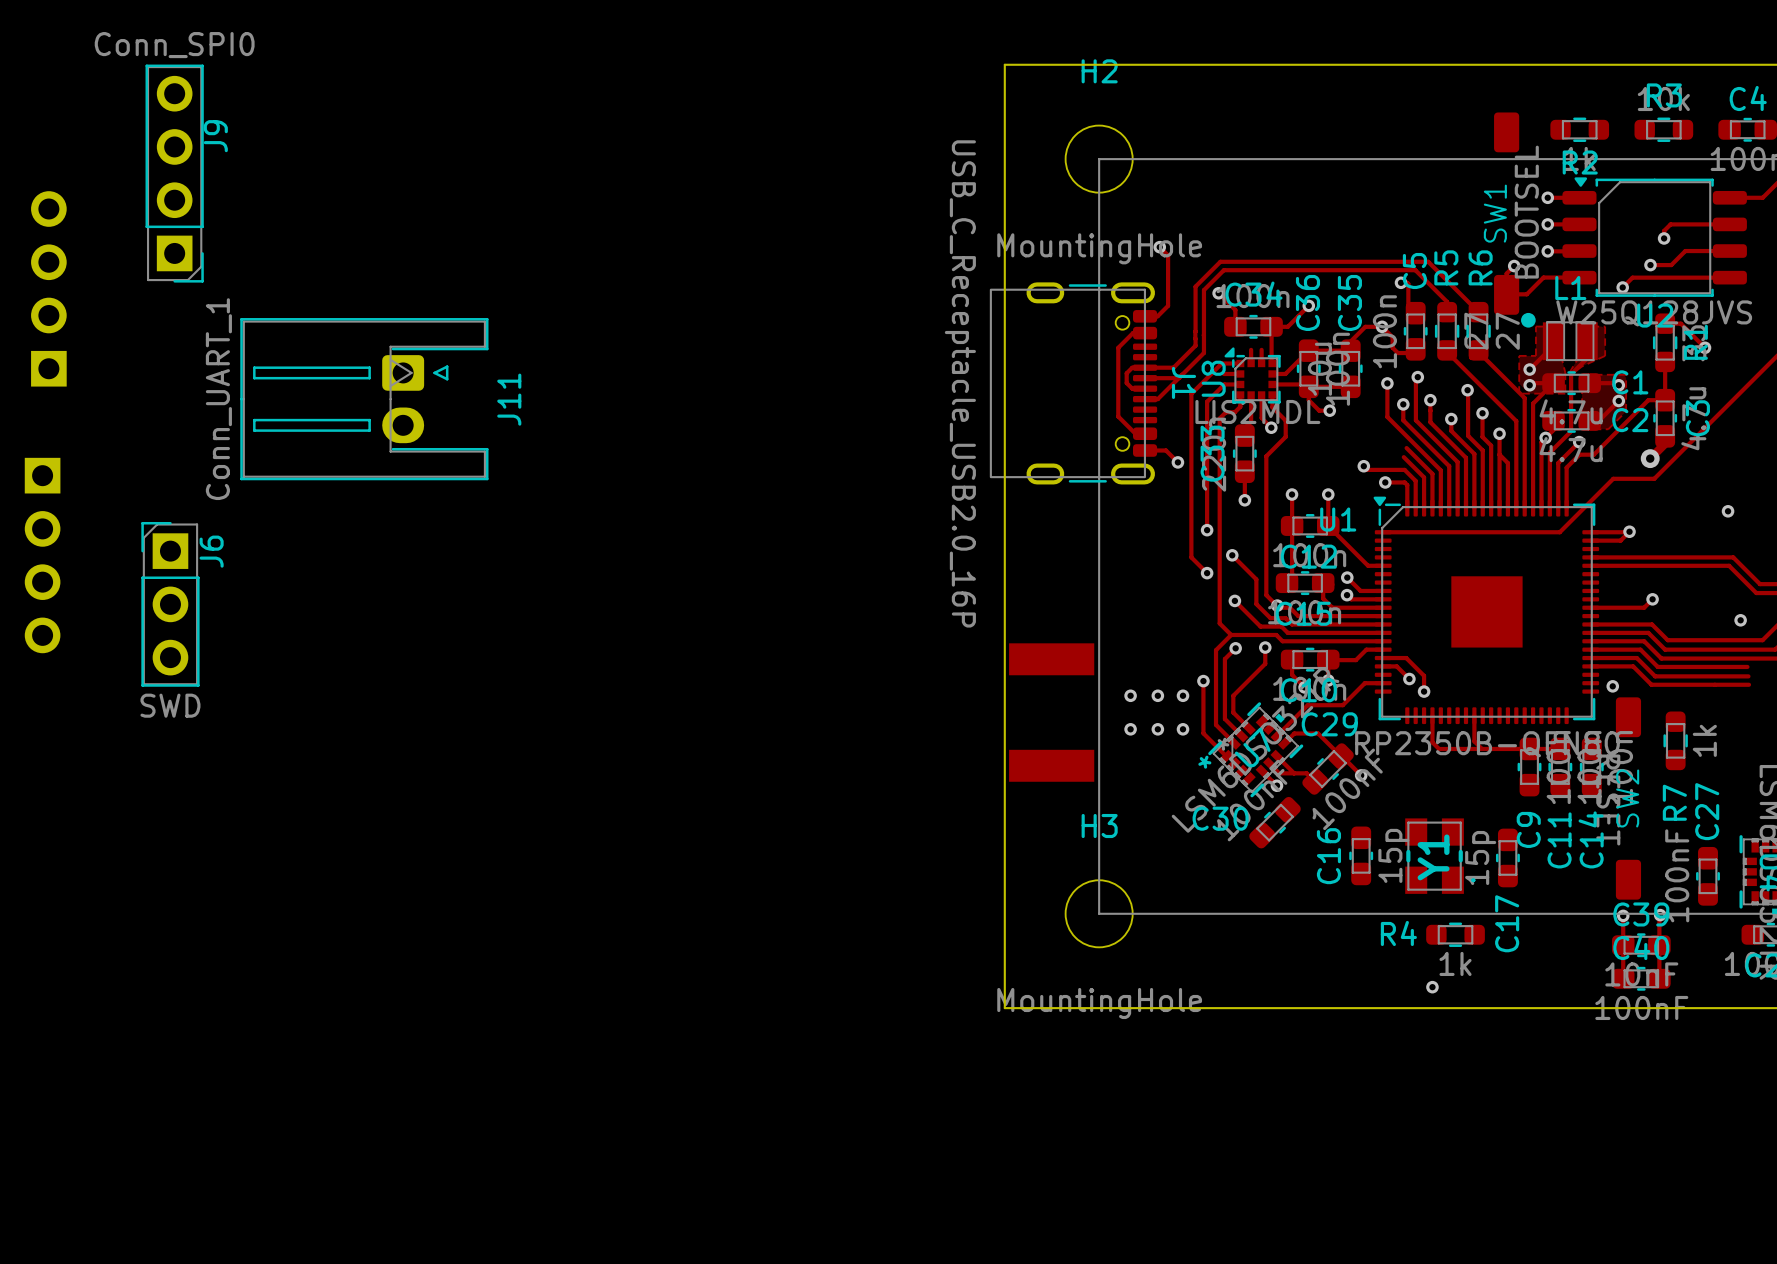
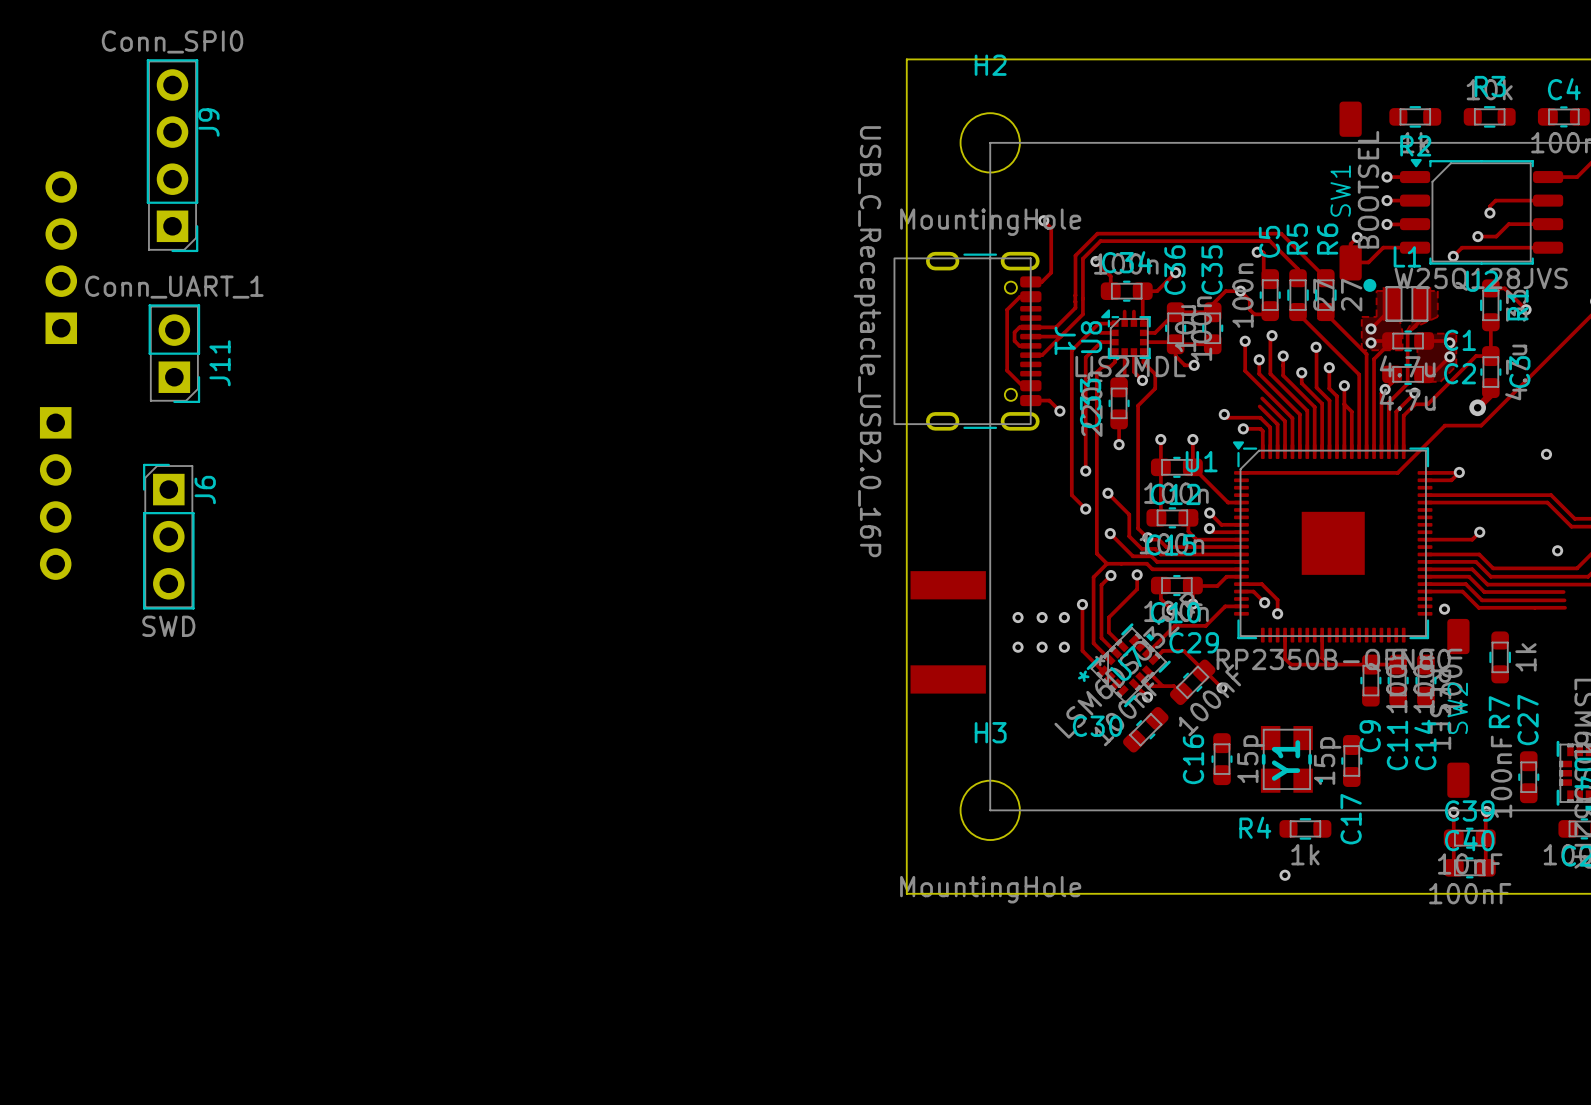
J11 footprint: [240, 318, 489, 481] -> [148, 304, 201, 403]
J11 value position: Conn_UART_1 (218, 399) -> Conn_UART_1 (174, 287)
J11 name position: J11 (509, 399) -> J11 (220, 363)

